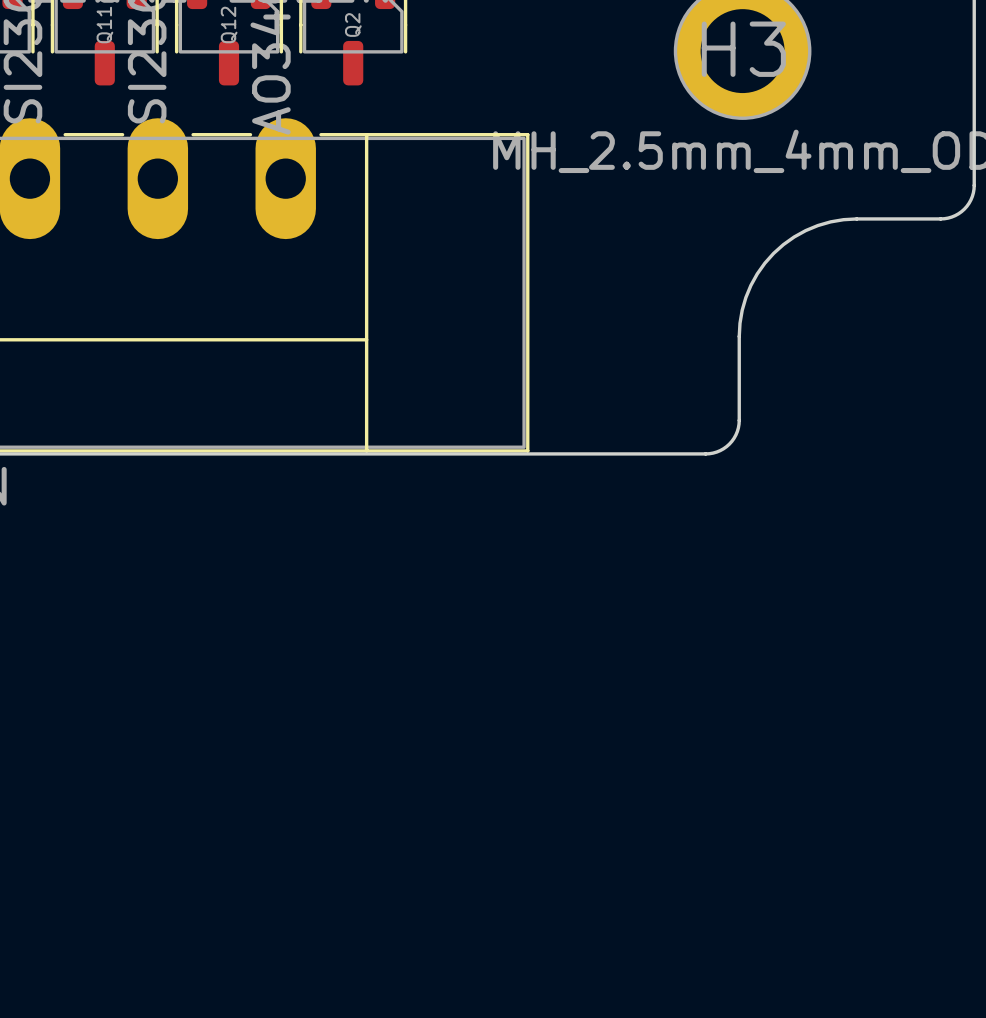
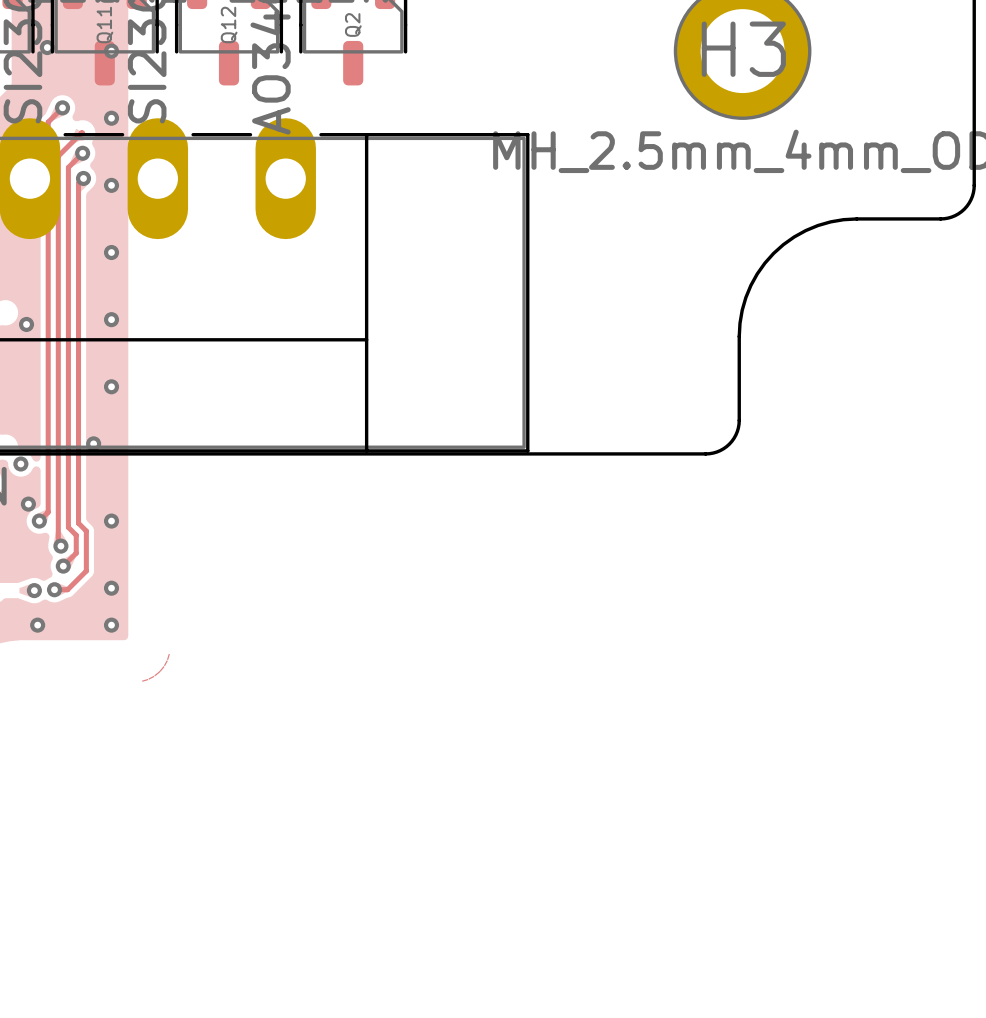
via: none -> (47, 47)
via: none -> (111, 51)
track: none -> (62, 107) (48, 122) (48, 512) (39, 521)
via: none -> (62, 107)
via: none -> (111, 118)
track: none -> (82, 132) (58, 156) (58, 543) (60, 546)
track: none -> (82, 153) (68, 167) (68, 527) (76, 535) (76, 553) (63, 566)
via: none -> (82, 153)
track: none -> (83, 178) (78, 183) (78, 523)
via: none -> (83, 178)
via: none -> (111, 185)
via: none -> (111, 252)
via: none -> (111, 319)
via: none -> (26, 324)
via: none -> (111, 386)
via: none -> (93, 443)
via: none -> (20, 464)
via: none -> (28, 504)
via: none -> (39, 521)
via: none -> (111, 521)
track: none -> (78, 523) (86, 531) (86, 570) (67, 589) (54, 589)
via: none -> (60, 546)
via: none -> (63, 566)
via: none -> (111, 588)
via: none -> (54, 589)
via: none -> (34, 590)
via: none -> (37, 625)
via: none -> (111, 625)
zone outline: none -> (169, 654) (160, 671) (154, 676) (142, 681)

